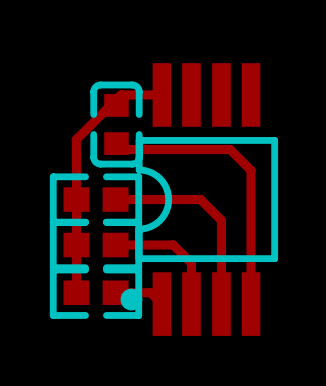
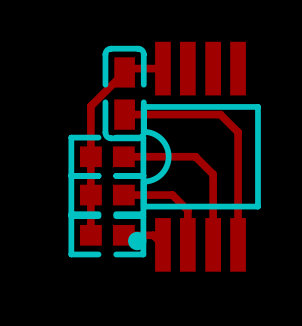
part footprint: [90, 81, 143, 168] -> [102, 45, 147, 142]

